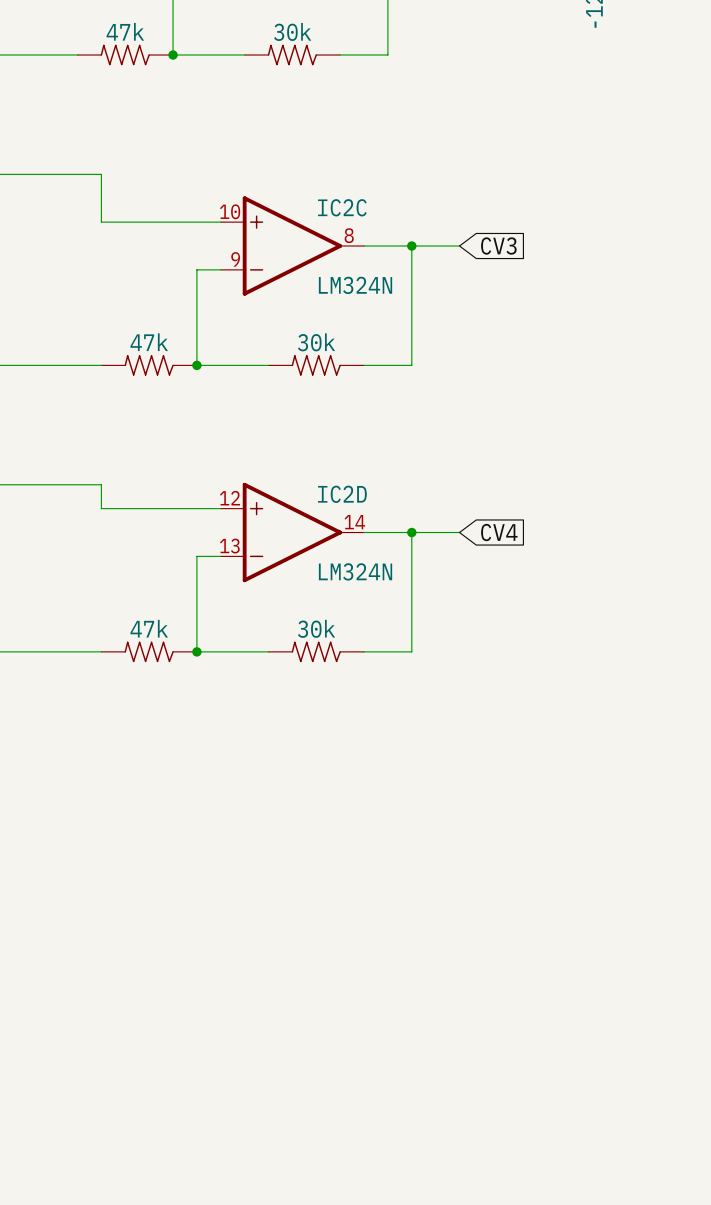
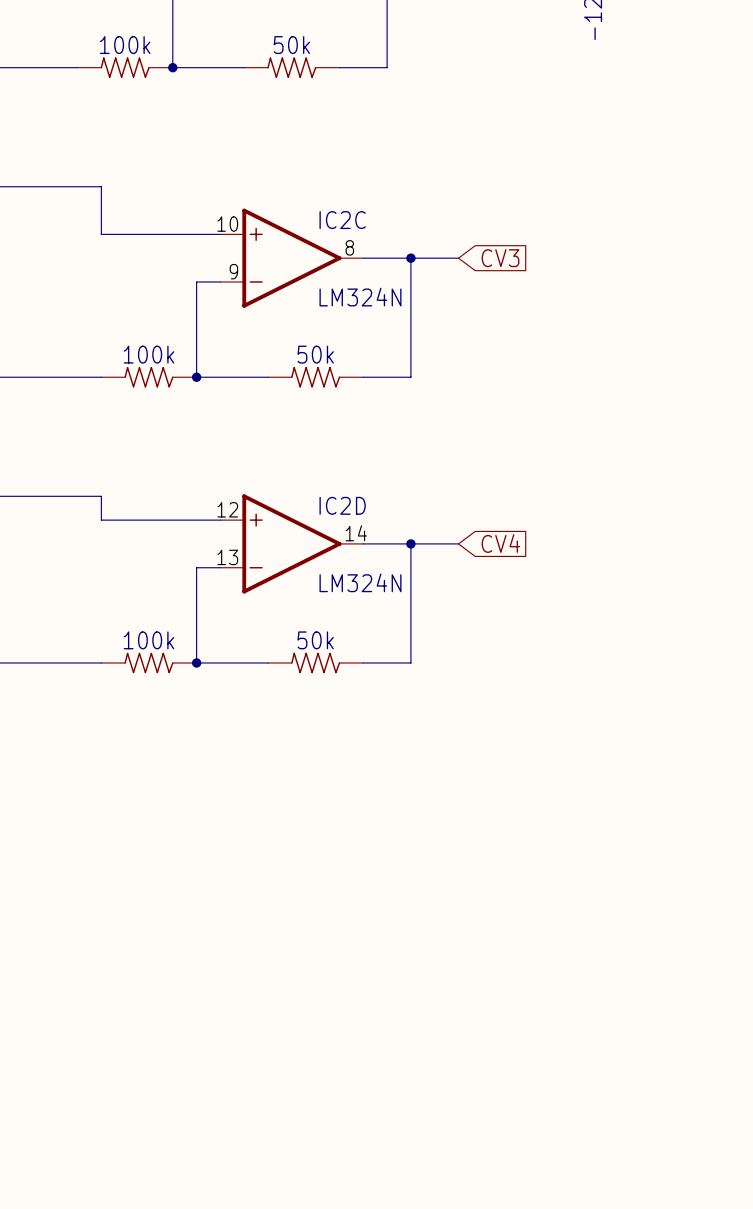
part value: 47k (125, 31) -> 100k (125, 45)
part value: 30k (292, 31) -> 50k (291, 45)
part value: 47k (149, 342) -> 100k (148, 354)
part value: 30k (316, 342) -> 50k (315, 354)
part value: 47k (149, 628) -> 100k (148, 640)
part value: 30k (316, 628) -> 50k (315, 640)

